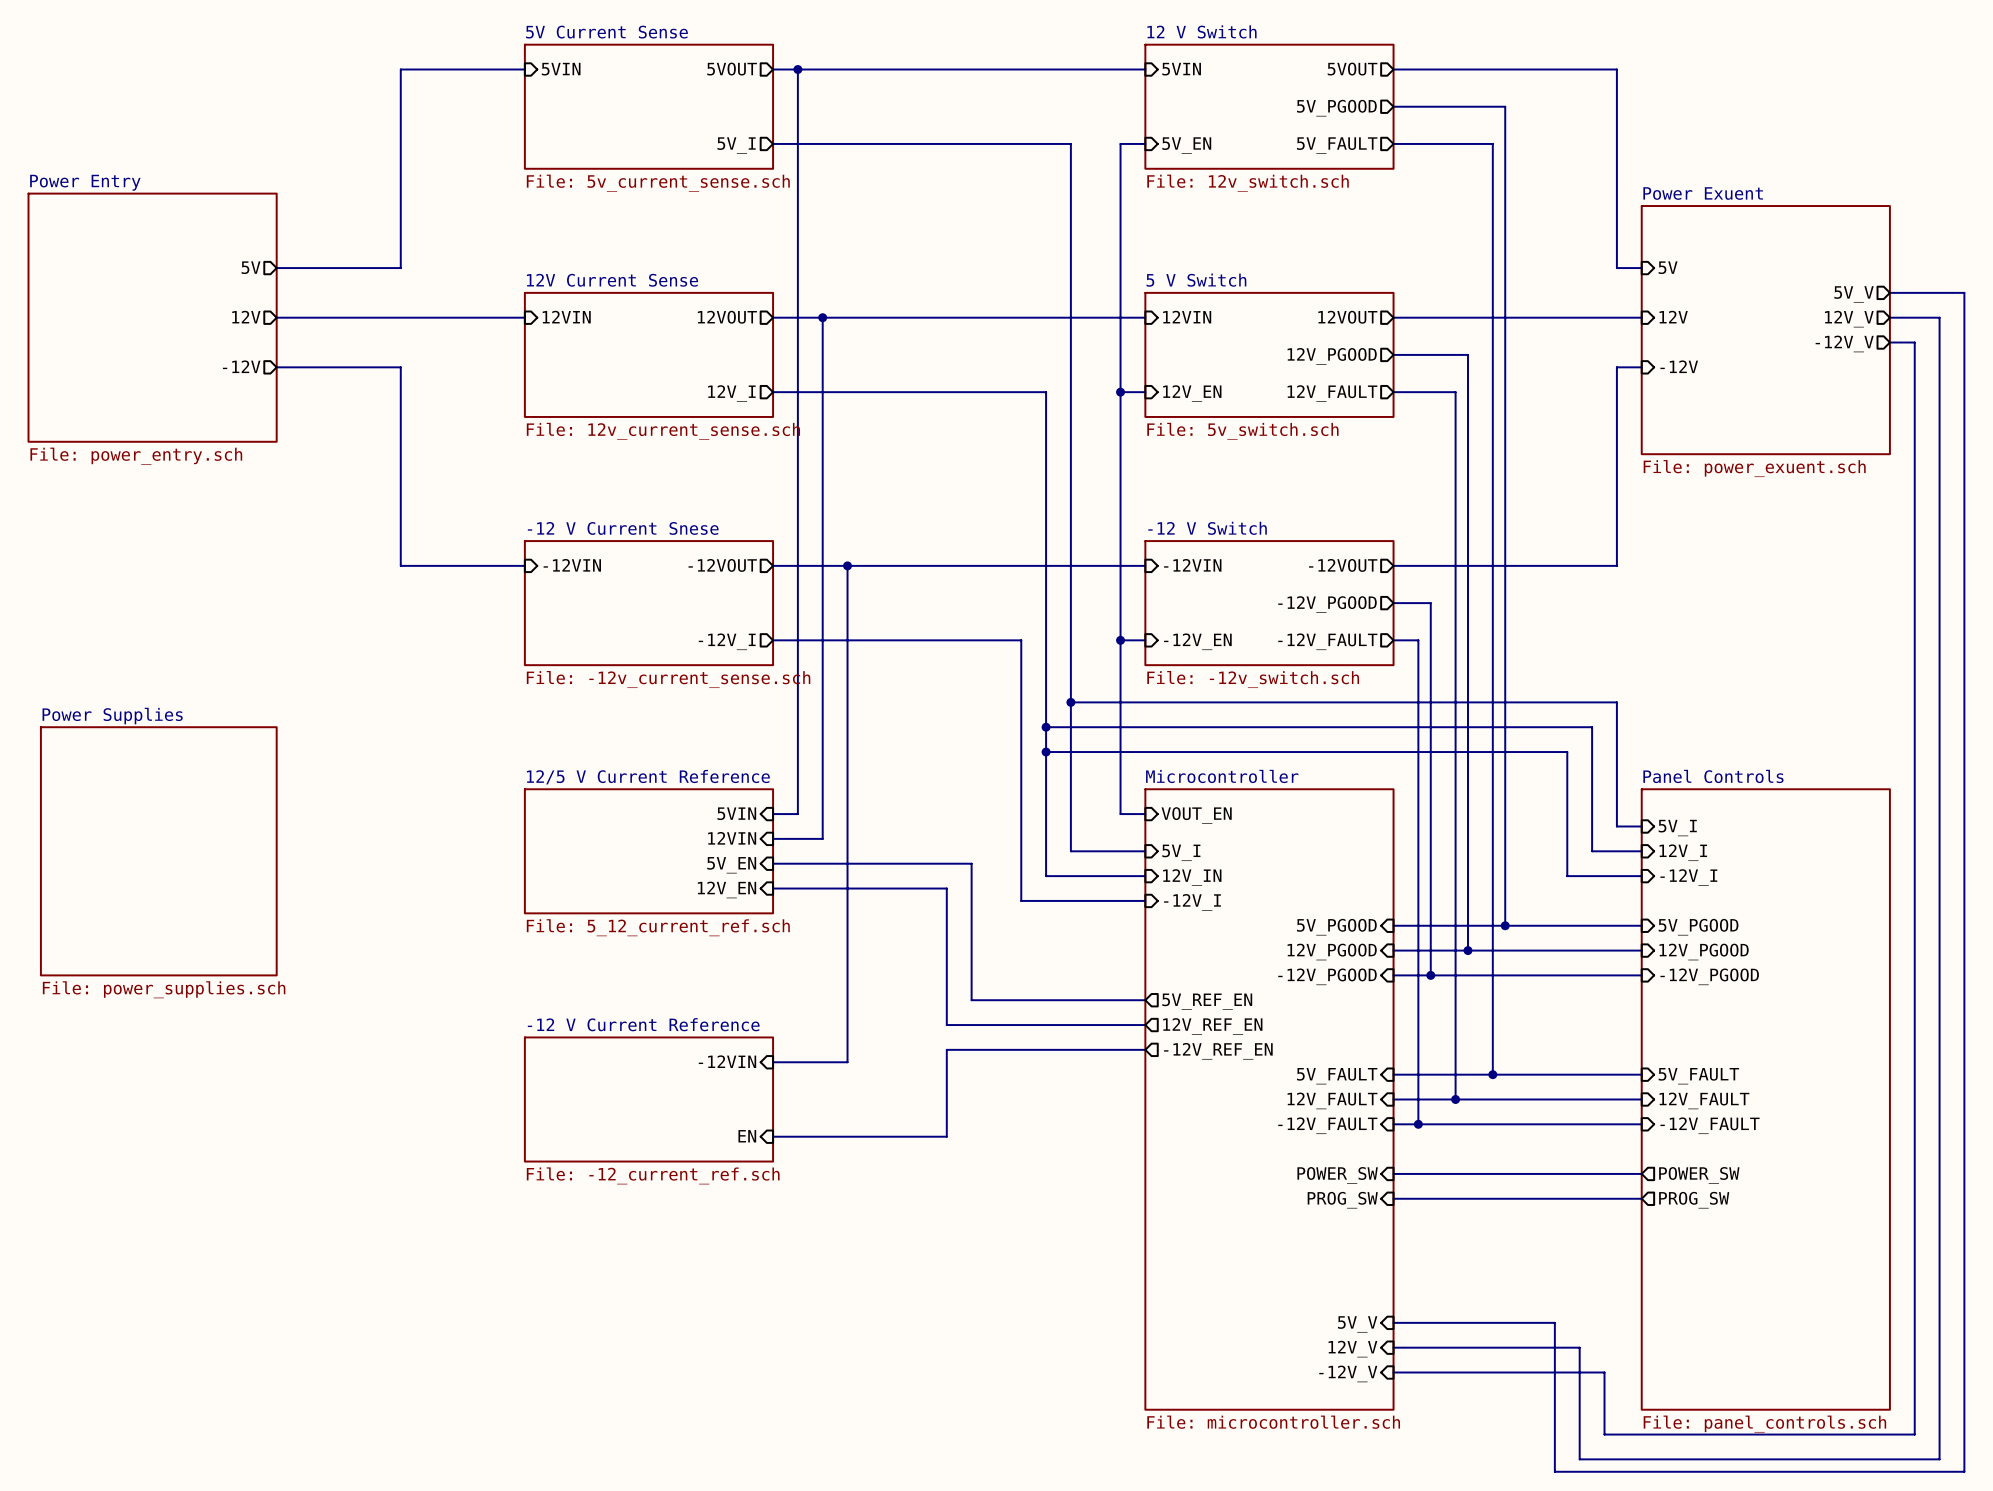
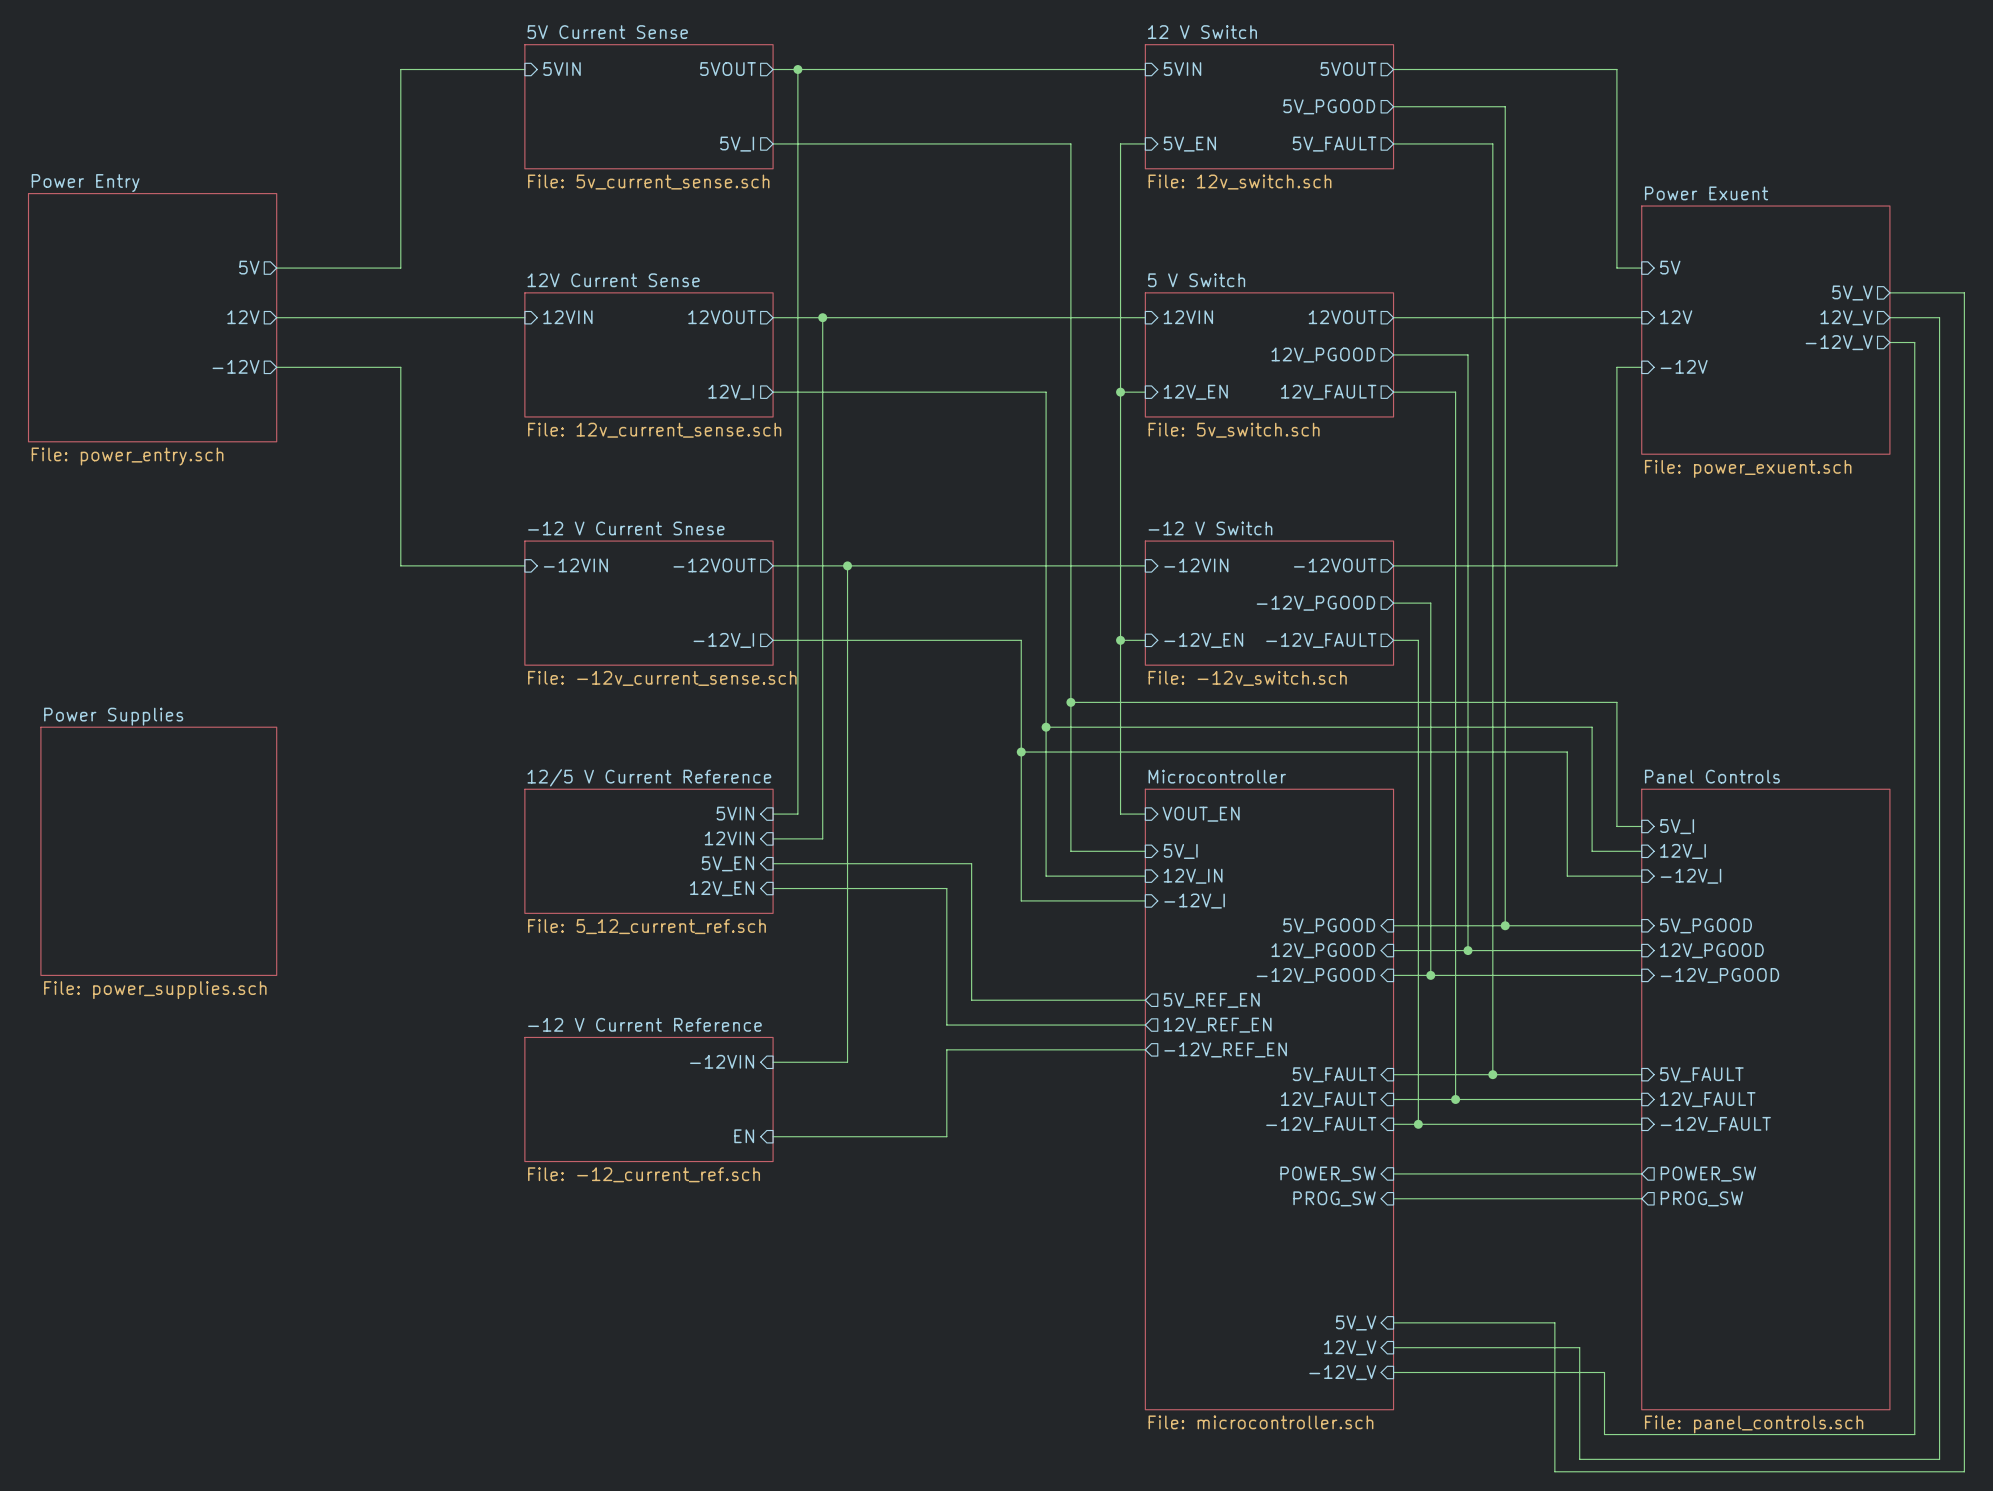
wire: none -> (1021, 752) (1046, 752)
junction position: (1046, 752) -> (1021, 752)

